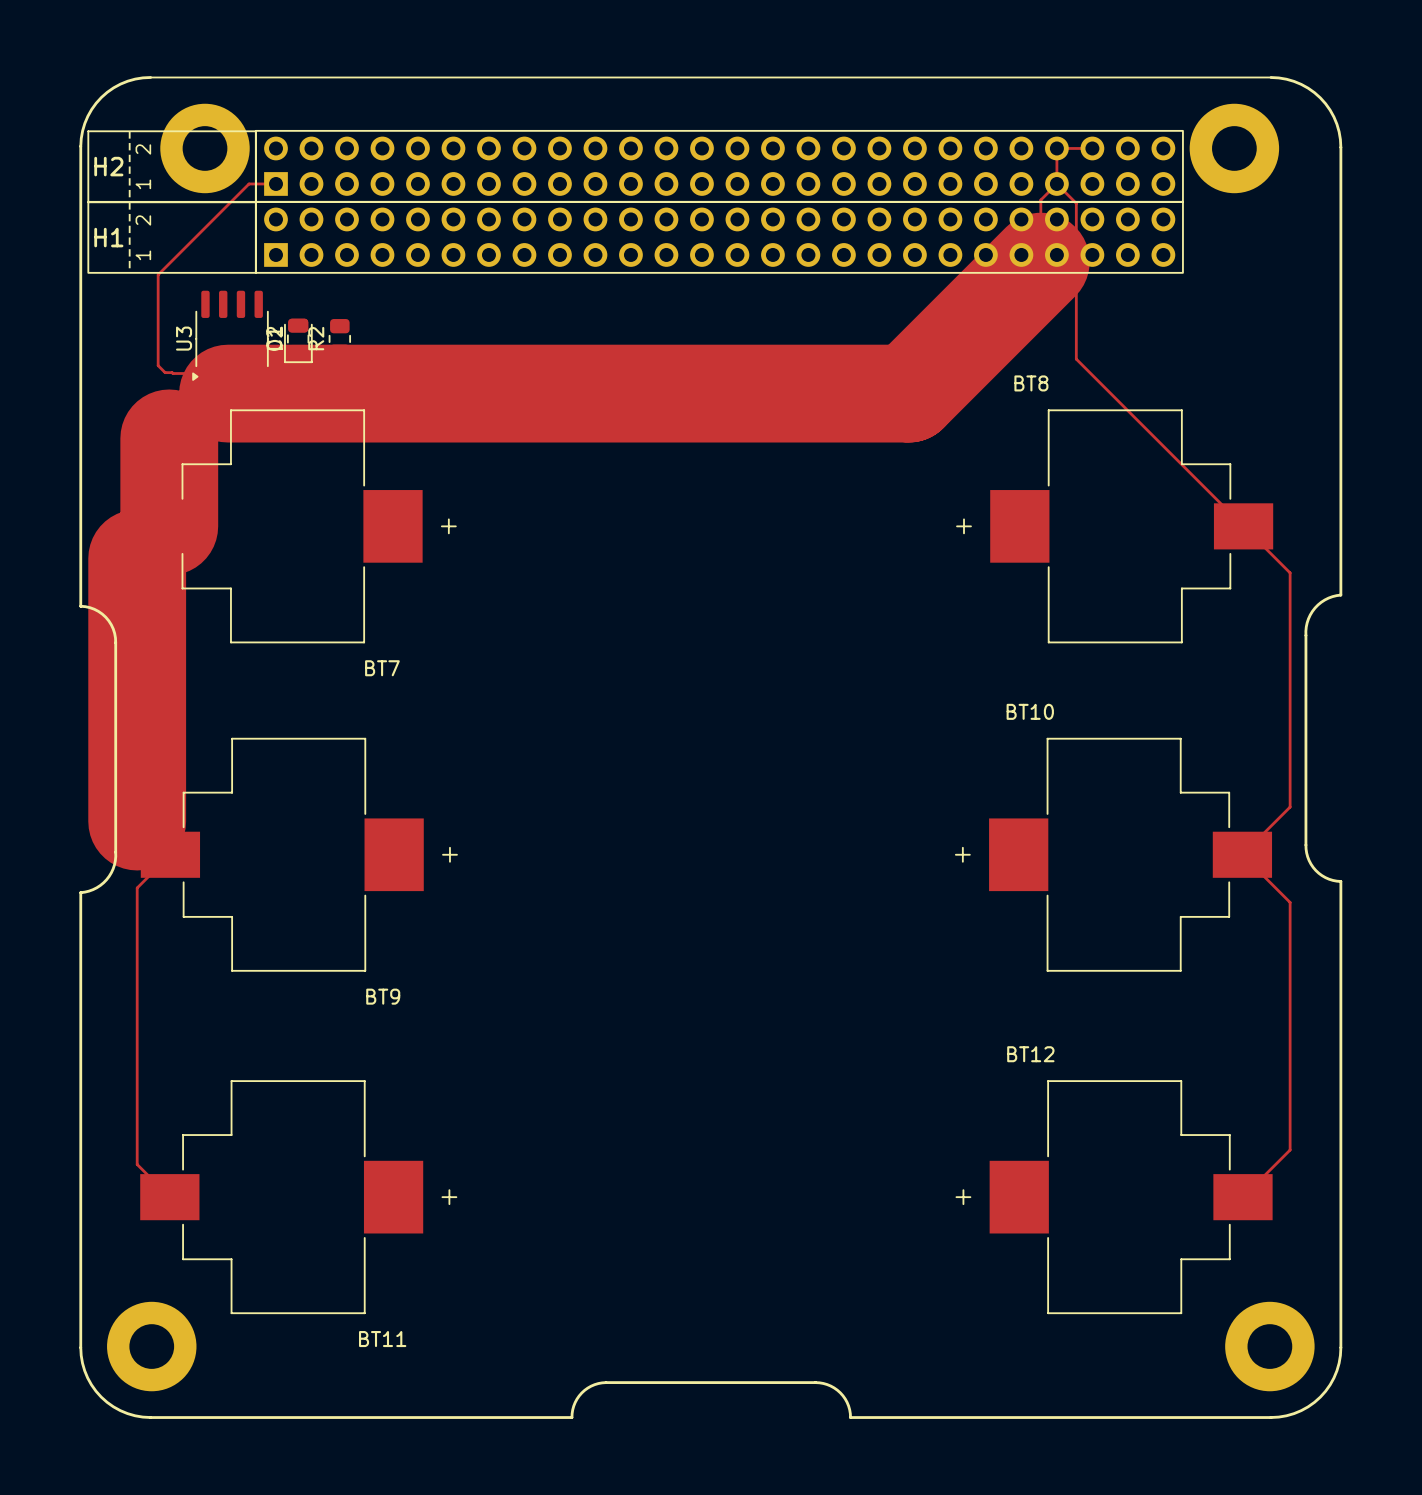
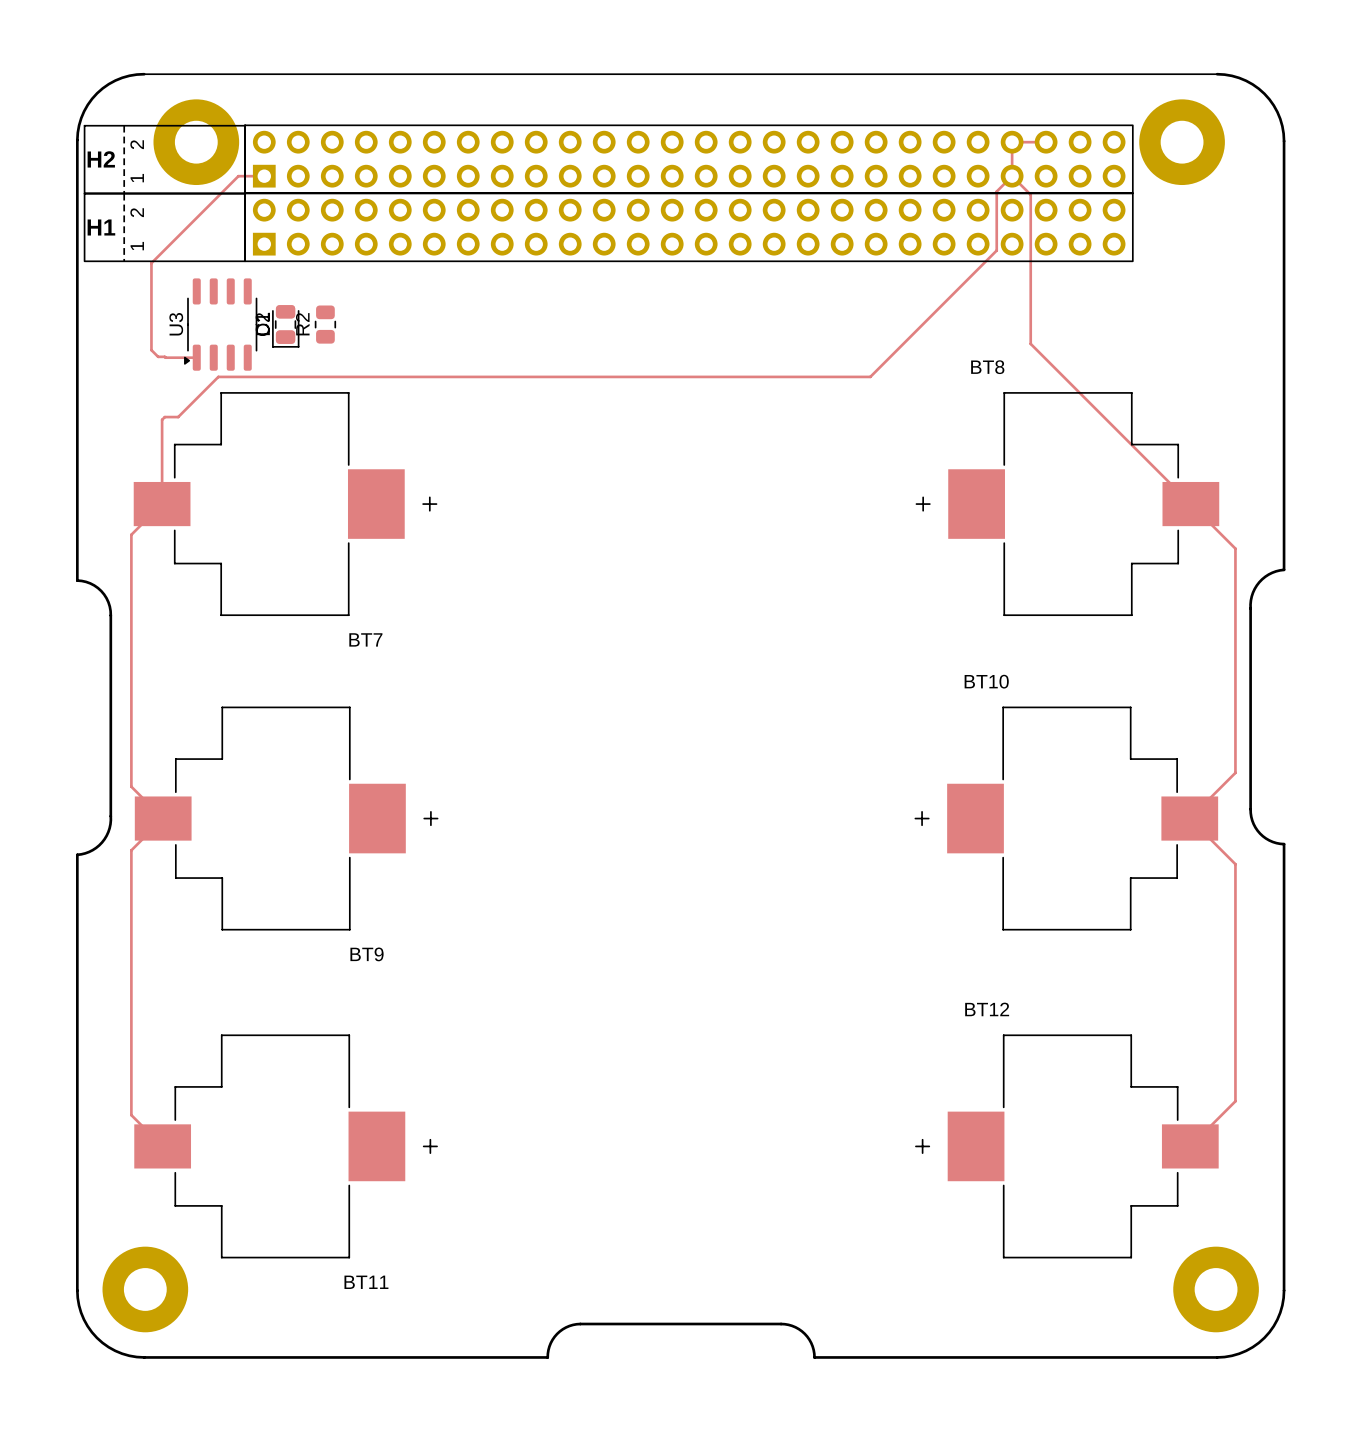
track width: thick (1040, 261) (908, 393) (228, 393) -> thin (996, 250) (870, 376) (218, 376)
track width: thick (169, 438) (169, 526) -> thin (162, 419) (162, 504)
track width: thick (137, 558) (137, 821) -> thin (131, 534) (131, 786)

